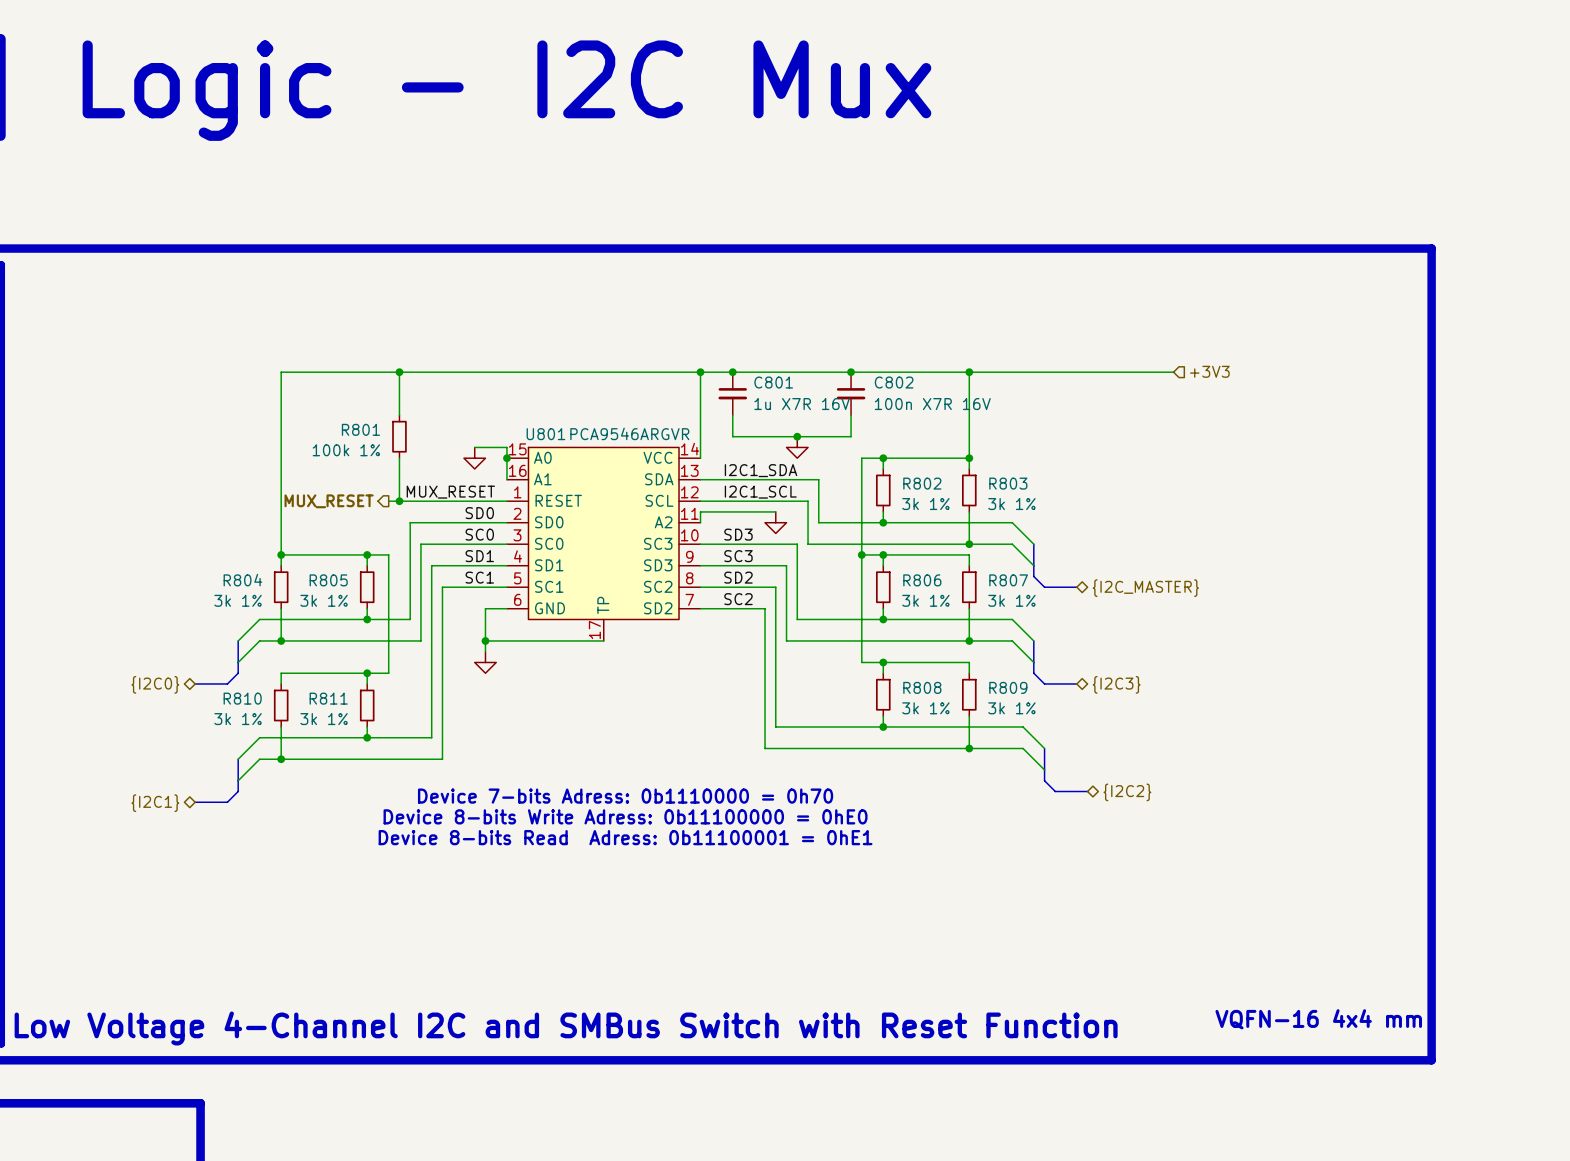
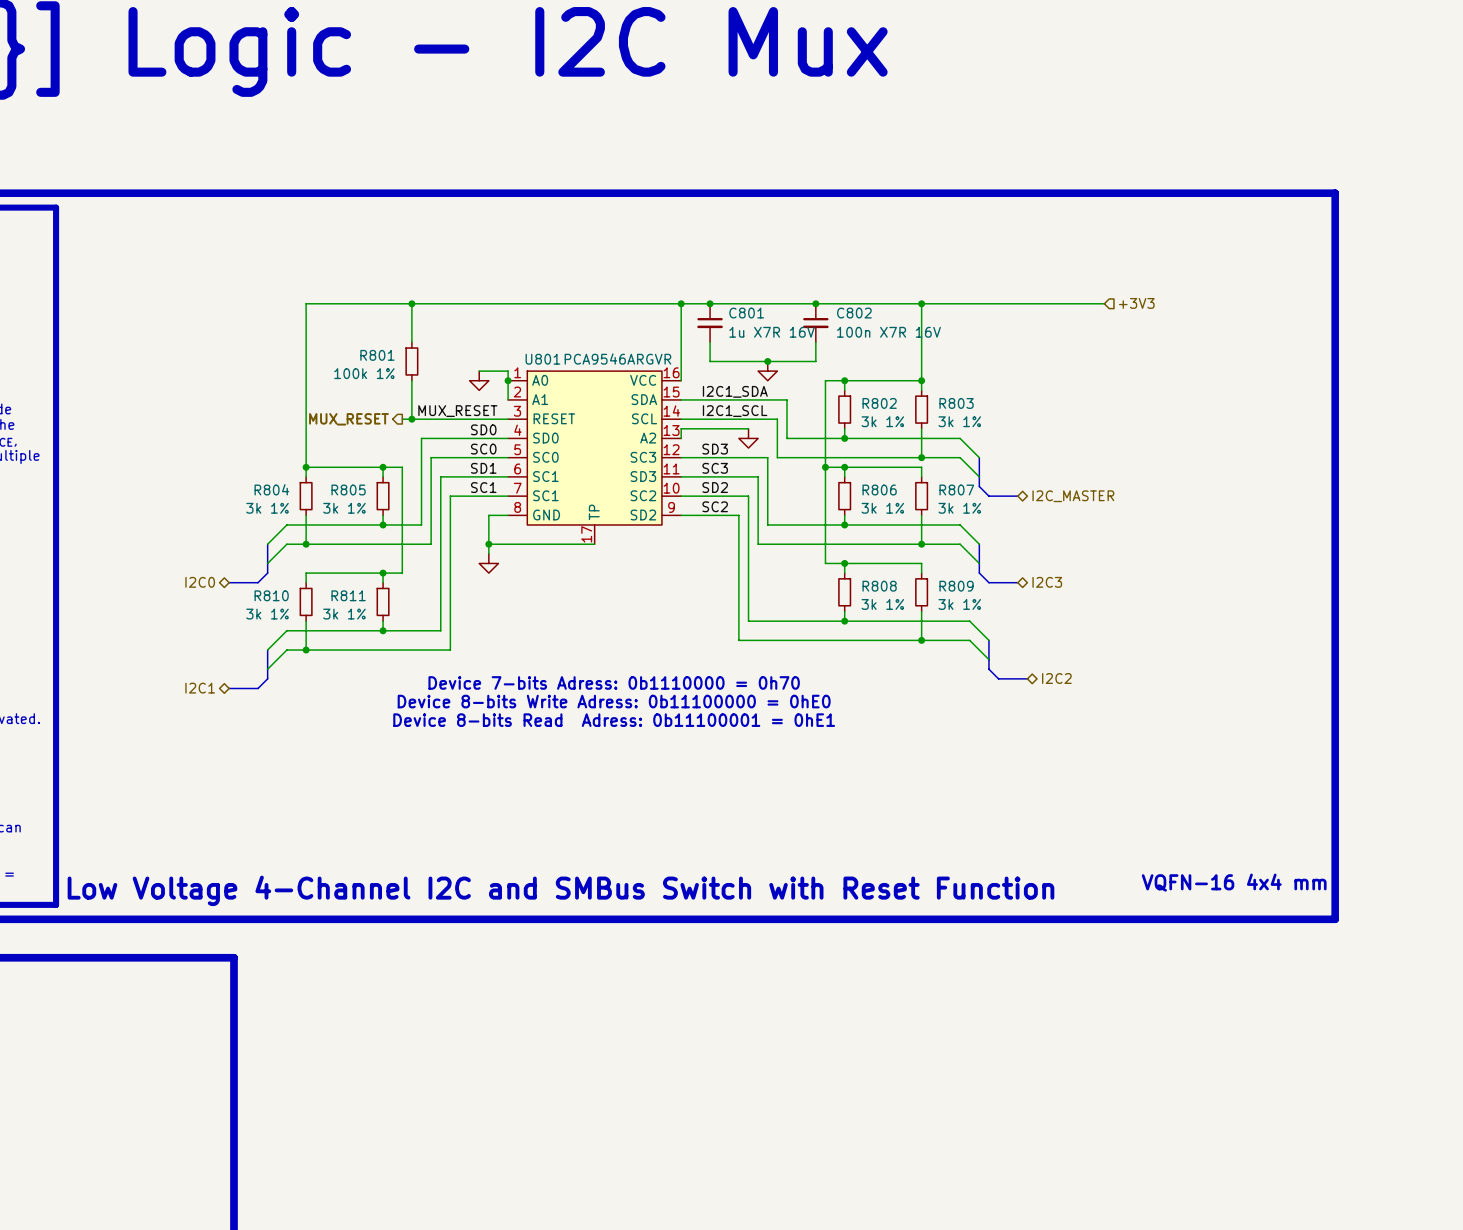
U801 symbol: [506, 447, 701, 641] -> [508, 371, 682, 545]
hierarchical label: {I2C_MASTER} (1145, 588) -> I2C_MASTER (1073, 496)
hierarchical label: {I2C0} (155, 684) -> I2C0 (200, 582)
hierarchical label: {I2C3} (1116, 684) -> I2C3 (1047, 582)
hierarchical label: {I2C2} (1127, 792) -> I2C2 (1056, 678)
hierarchical label: {I2C1} (155, 803) -> I2C1 (200, 688)

